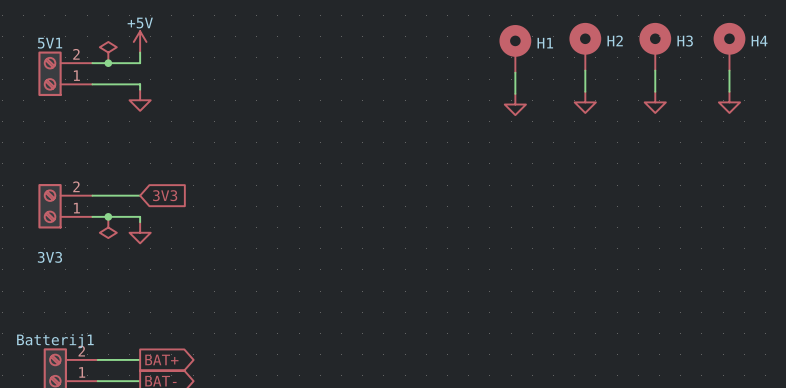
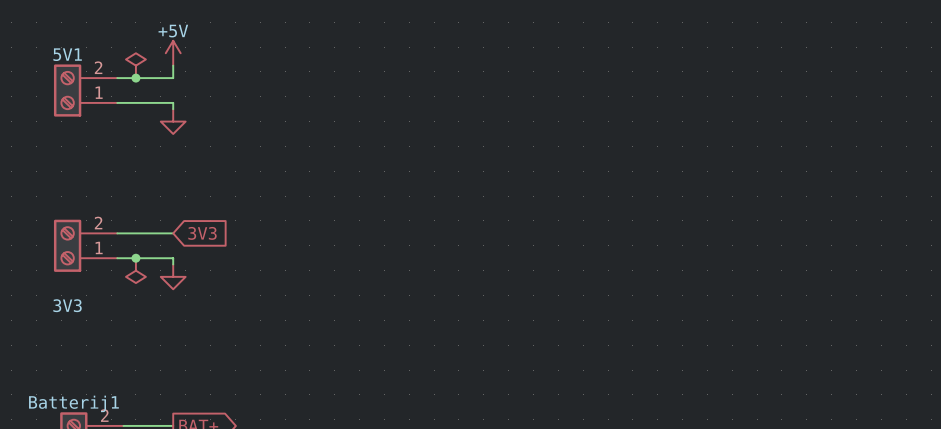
H2: (585, 46) -> none
H3: (655, 46) -> none
H4: (729, 46) -> none
H1: (515, 48) -> none
wire: (585, 70) (585, 91) -> none
wire: (655, 70) (655, 91) -> none
wire: (729, 70) (729, 91) -> none
wire: (515, 72) (515, 93) -> none
power symbol: (585, 102) -> none
power symbol: (655, 102) -> none
power symbol: (729, 102) -> none
power symbol: (515, 104) -> none

